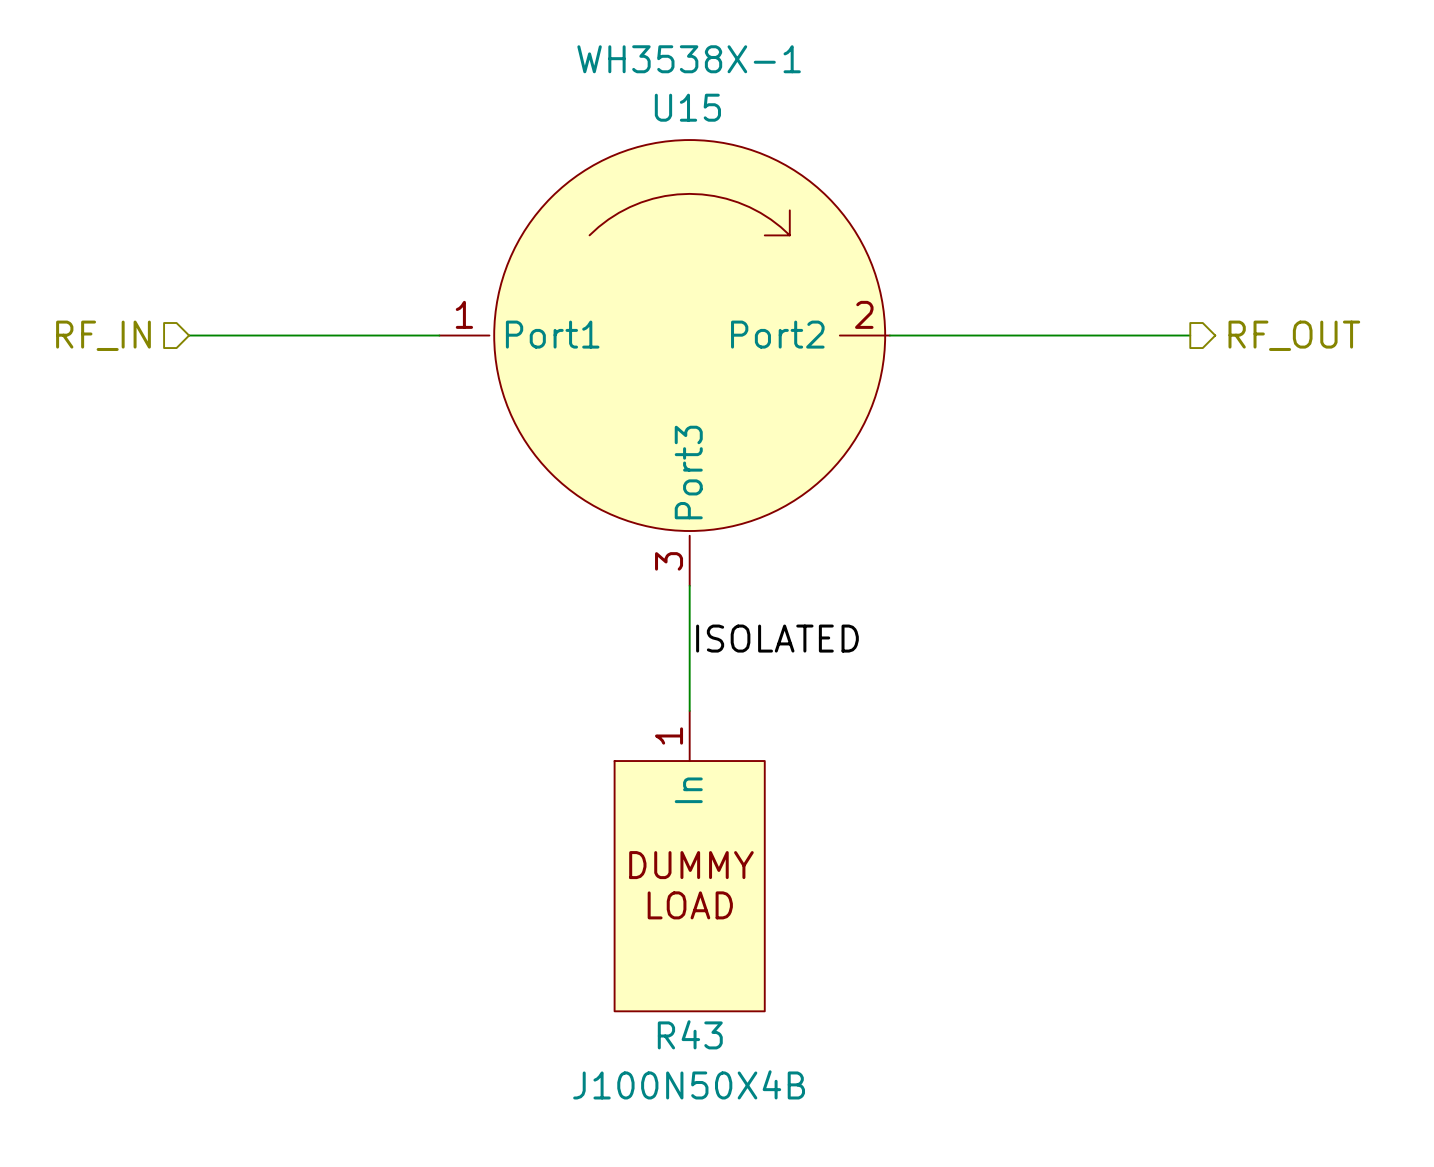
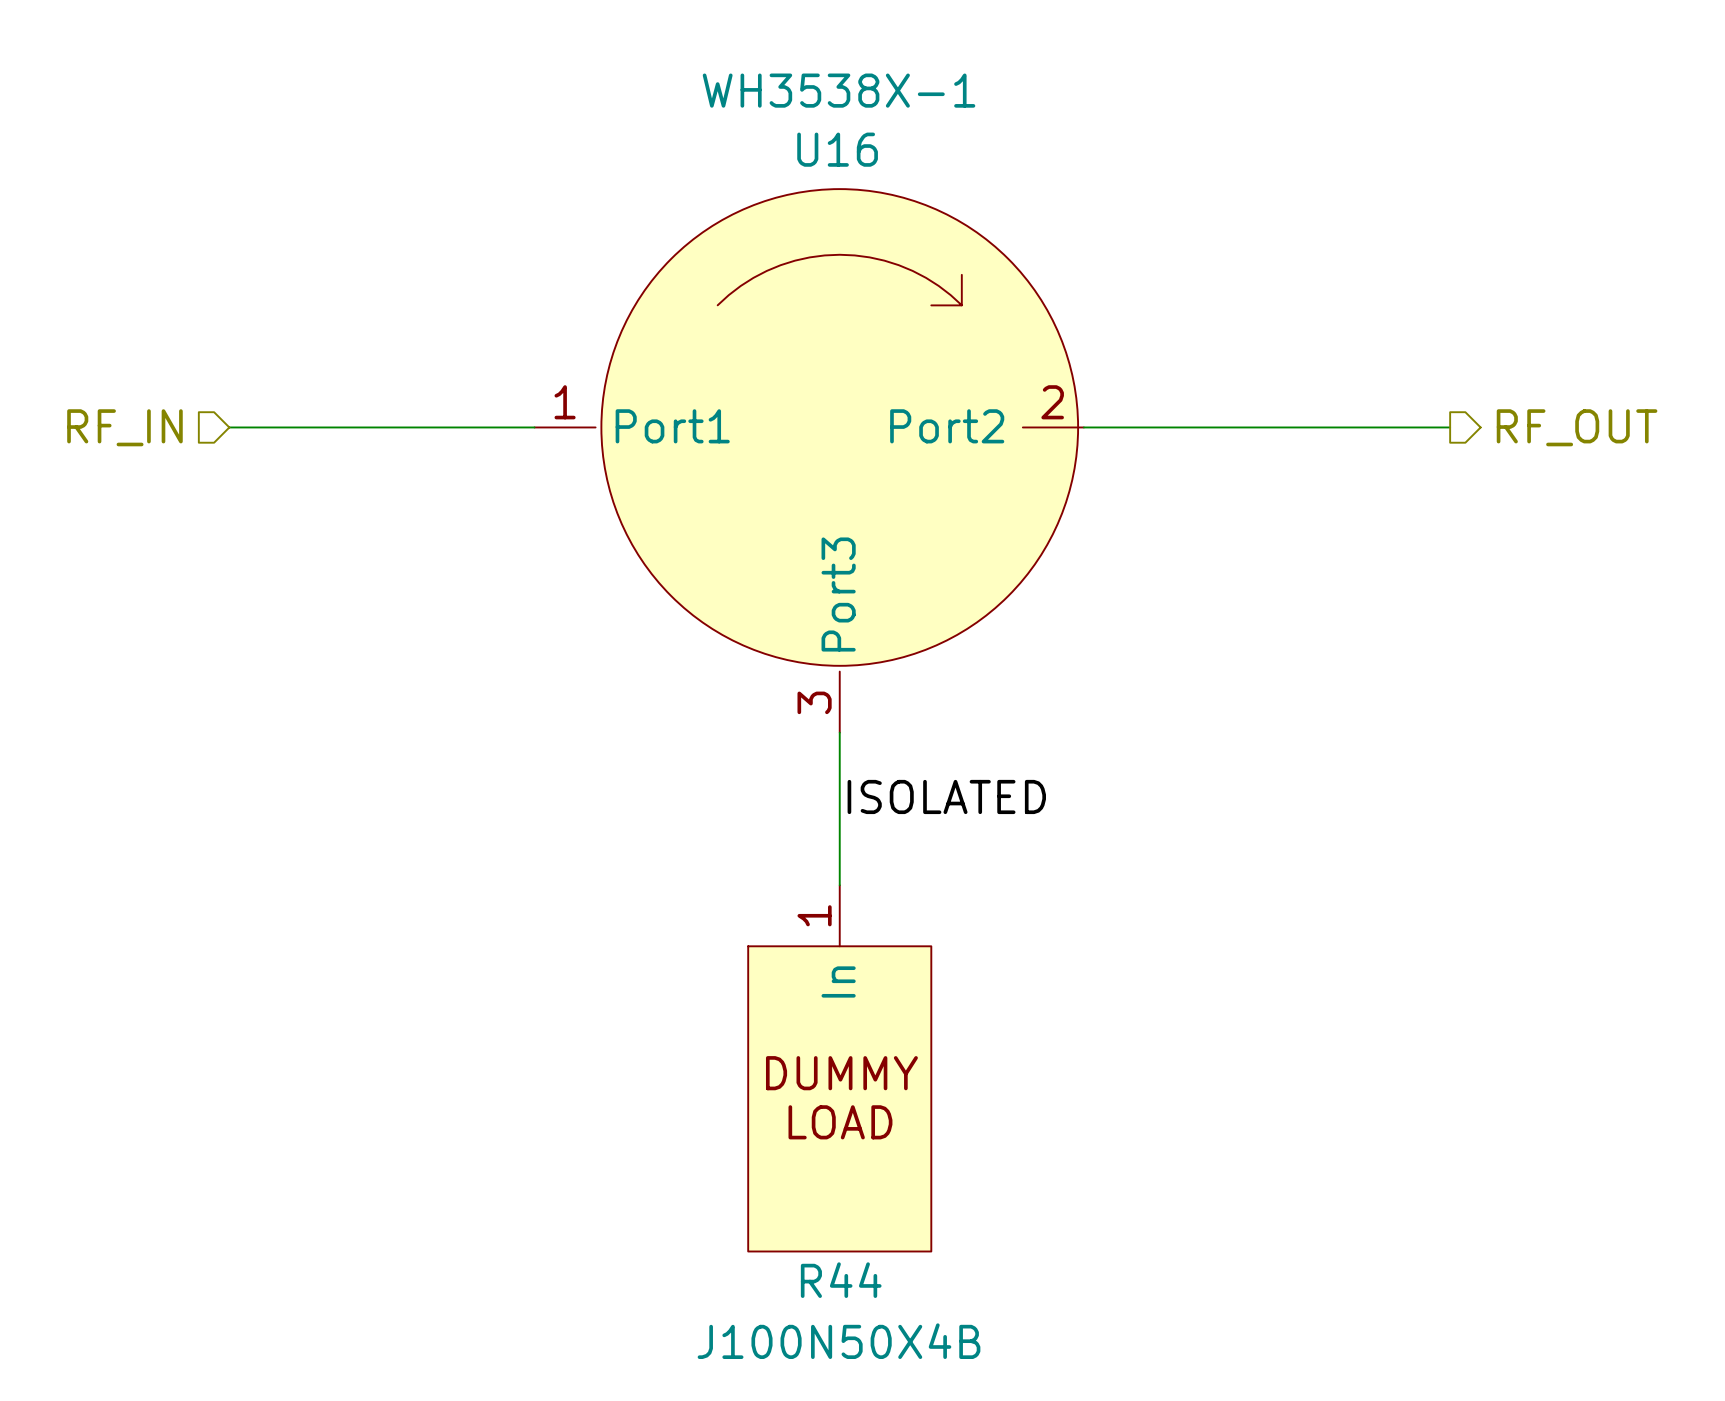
U15 name: U15 (687, 107) -> U16 (837, 149)
R43 name: R43 (690, 1034) -> R44 (841, 1280)

